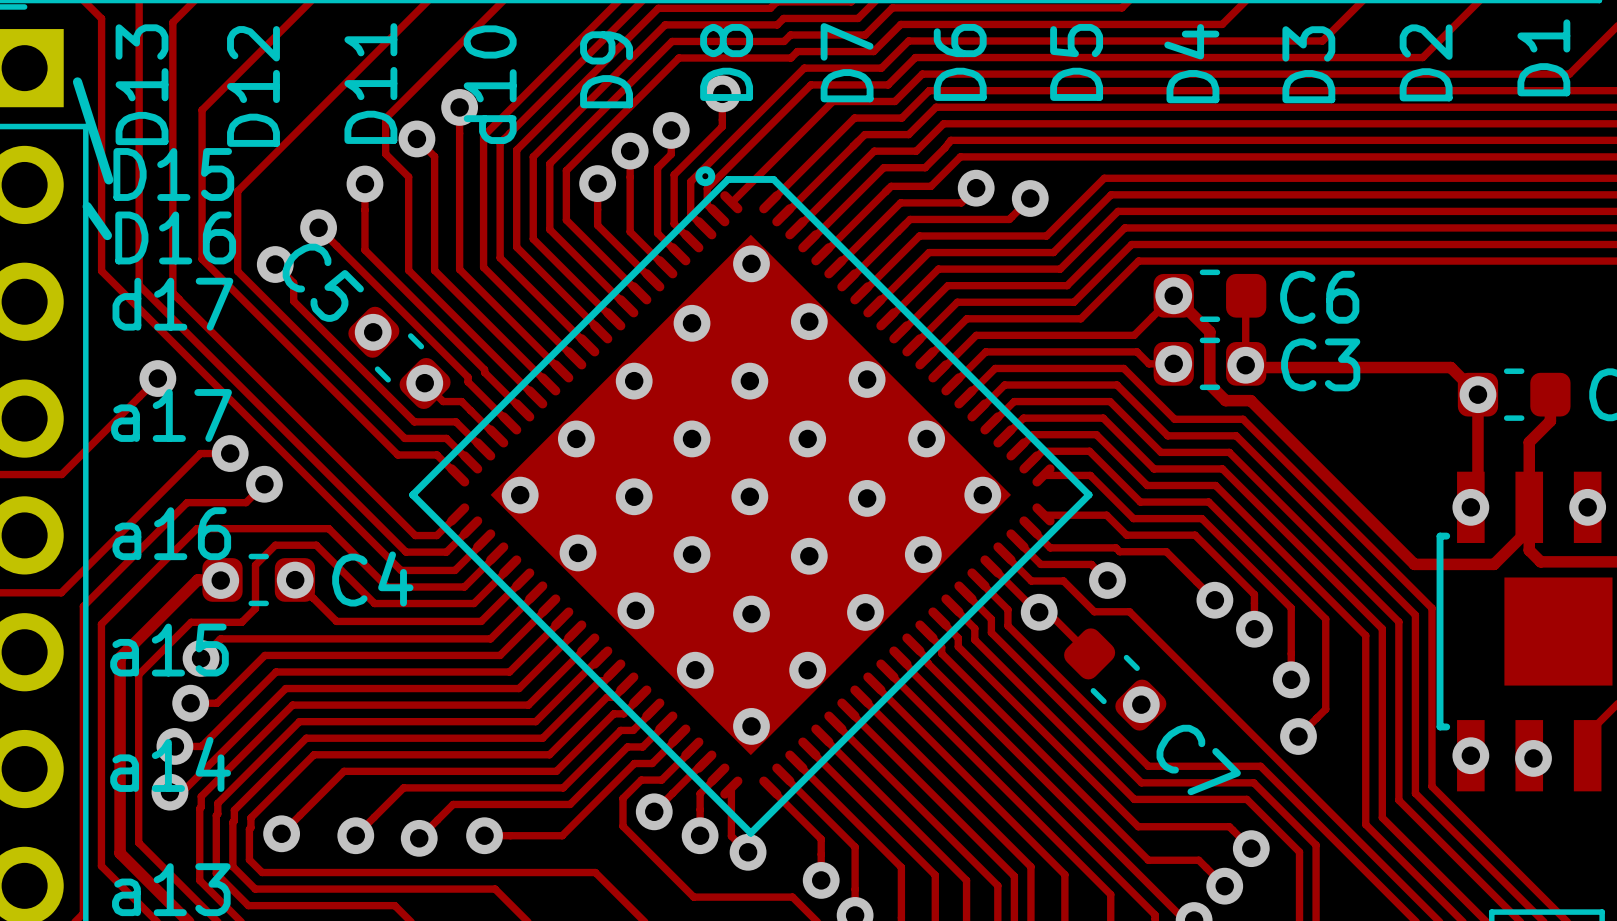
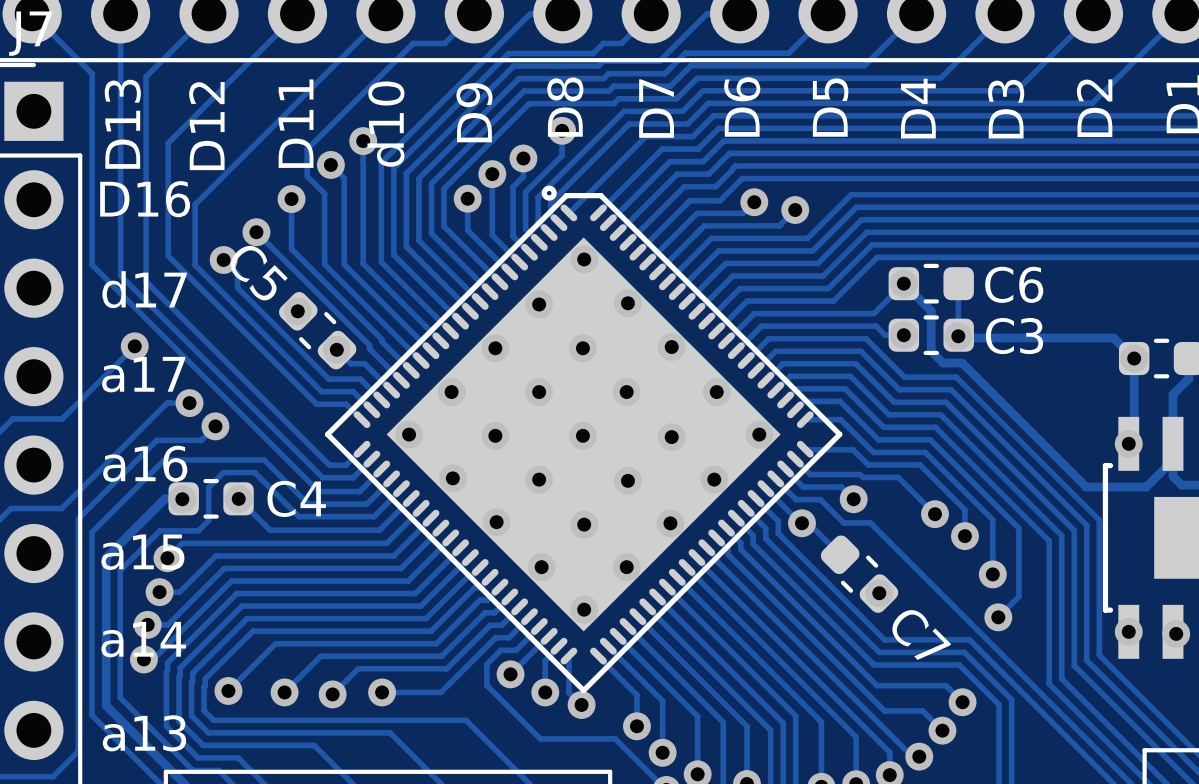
line: (77, 81) (108, 179) -> none
text: D15 (173, 174) -> D16 (145, 199)
line: (87, 206) (107, 235) -> none
text: D16 (175, 237) -> none

